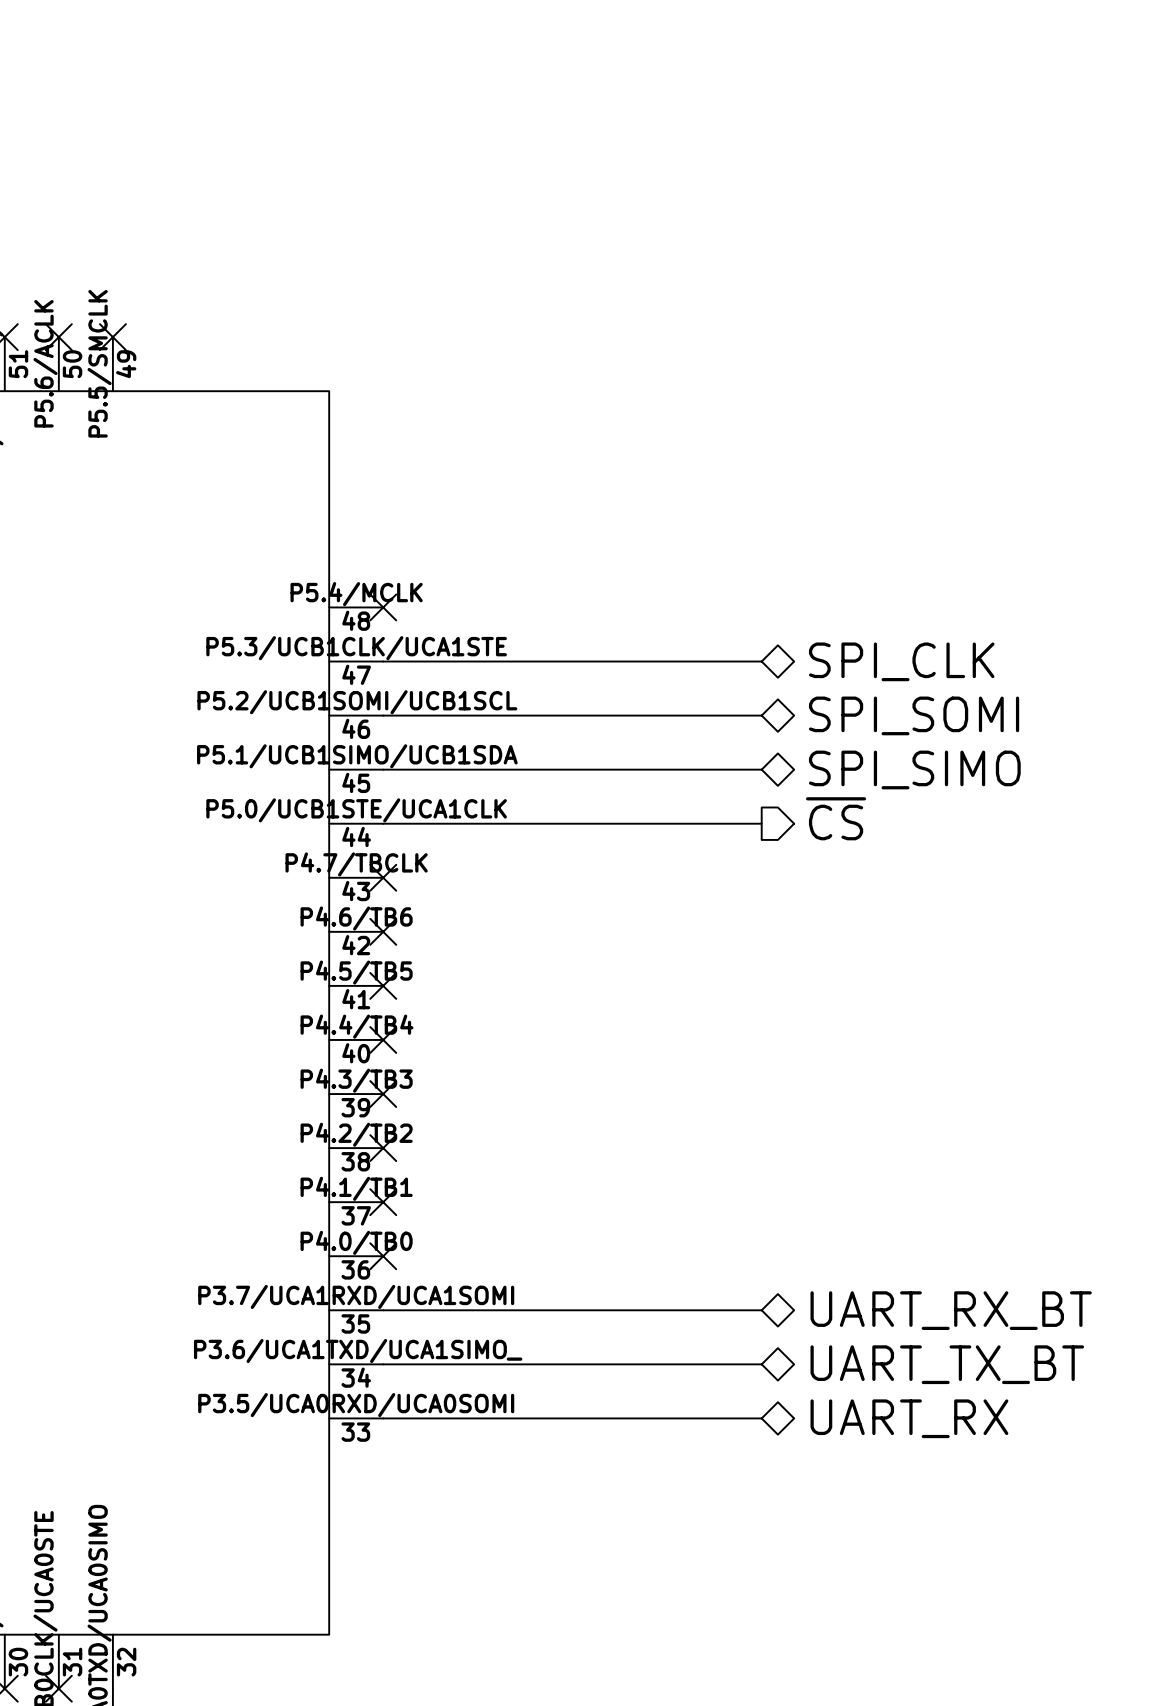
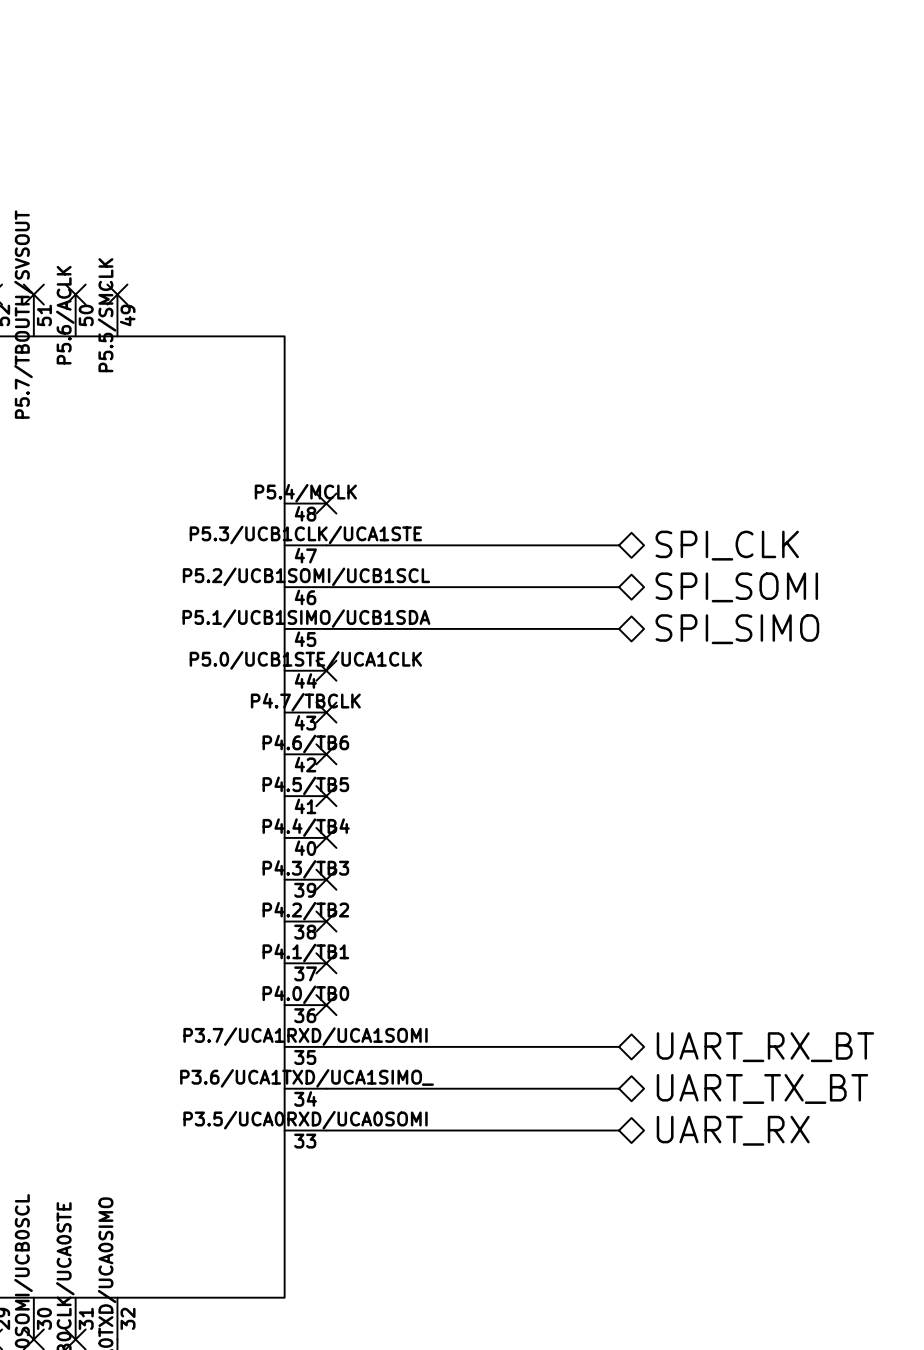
hierarchical label: ~{CS} (836, 818) -> none
wire: (383, 823) (761, 823) -> none
no-connect mark: none -> (326, 670)

